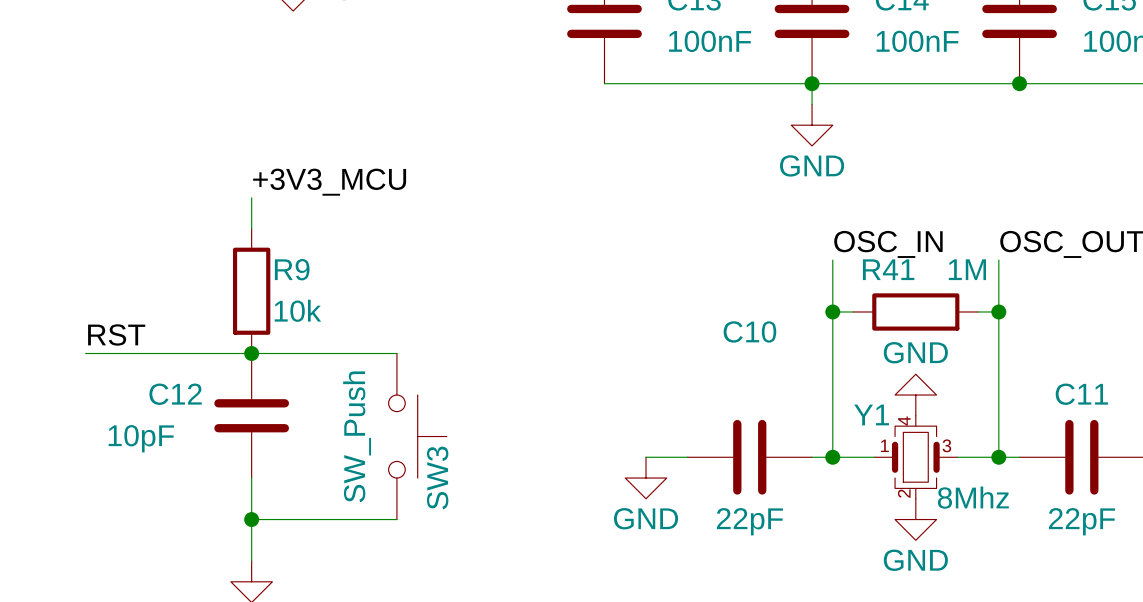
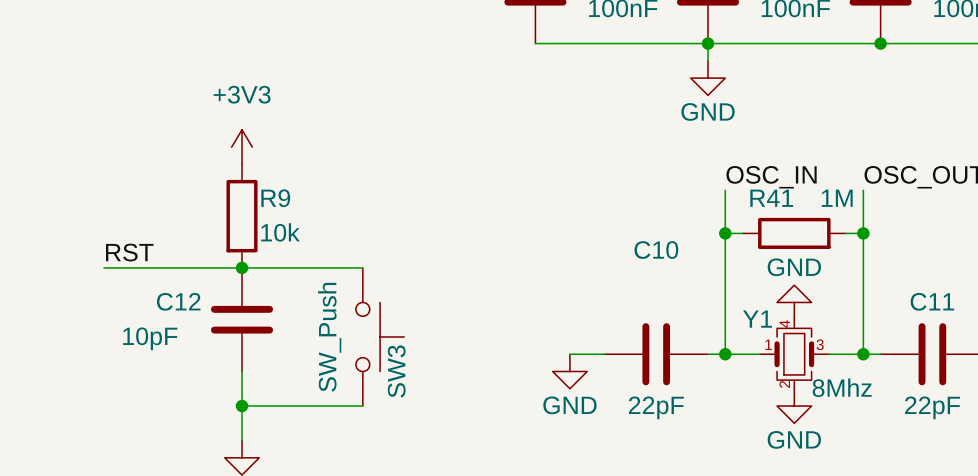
label: +3V3_MCU (329, 182) -> none
power symbol: none -> +3V3 (242, 147)

